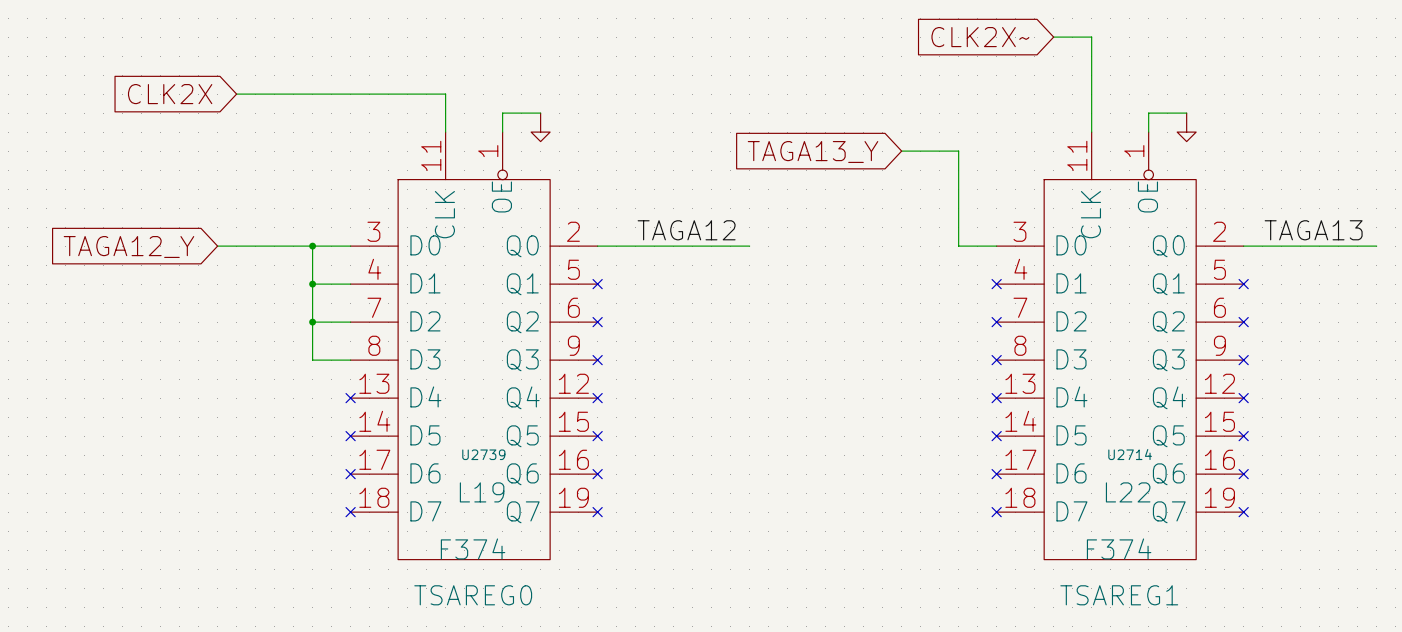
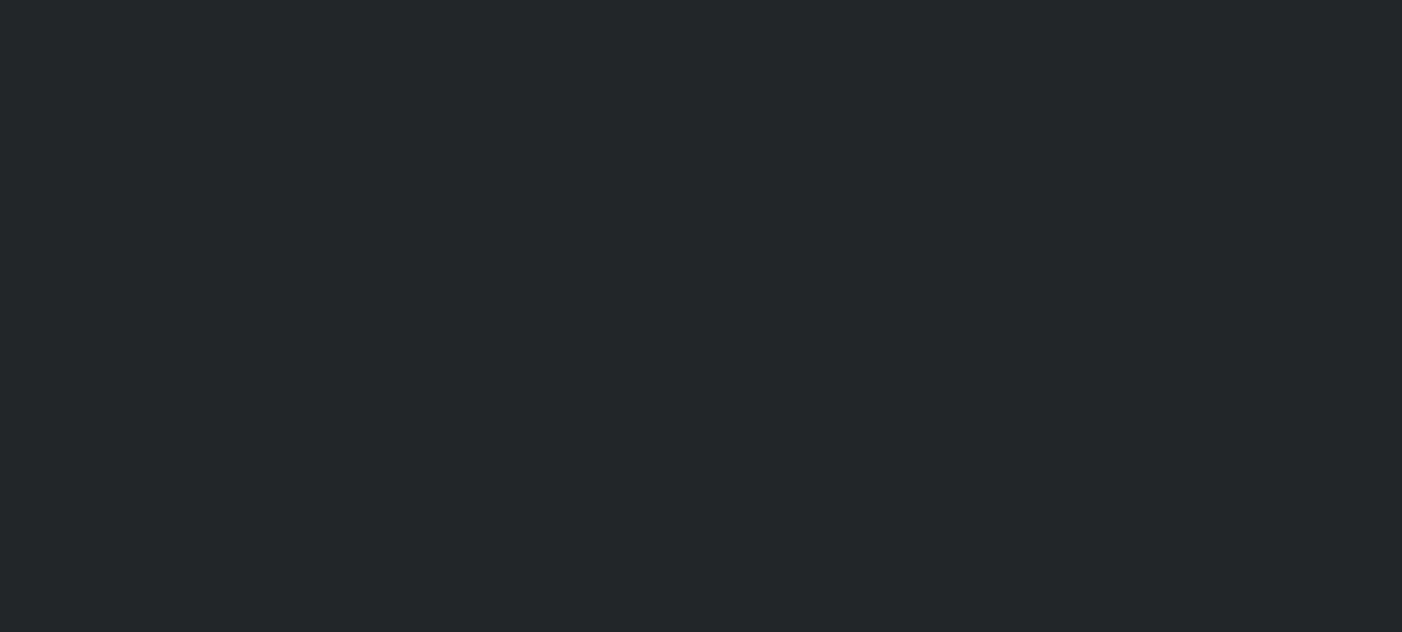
global label: CLK2X~ (980, 37) -> none
wire: (1053, 37) (1091, 37) (1091, 132) -> none
global label: CLK2X (170, 94) -> none
wire: (236, 94) (445, 94) (445, 132) -> none
wire: (540, 113) (502, 113) (502, 132) -> none
wire: (1186, 113) (1148, 113) (1148, 132) -> none
power symbol: (540, 127) -> none
power symbol: (1186, 127) -> none
wire: (901, 151) (958, 151) (958, 246) (996, 246) -> none
global label: TAGA13_Y (813, 152) -> none
label: TAGA12 (686, 230) -> none
label: TAGA13 (1313, 230) -> none
wire: (217, 246) (350, 246) -> none
wire: (312, 246) (312, 360) (350, 360) -> none
junction: (312, 246) -> none
wire: (597, 246) (749, 246) -> none
wire: (1243, 246) (1376, 246) -> none
global label: TAGA12_Y (128, 247) -> none
wire: (312, 284) (350, 284) -> none
junction: (312, 284) -> none
no-connect mark: (597, 284) -> none
no-connect mark: (996, 284) -> none
no-connect mark: (1243, 284) -> none
wire: (312, 322) (350, 322) -> none
junction: (312, 322) -> none
no-connect mark: (597, 322) -> none
no-connect mark: (996, 322) -> none
no-connect mark: (1243, 322) -> none
U2739: F374 (474, 345) -> none
U2714: F374 (1120, 345) -> none
no-connect mark: (597, 360) -> none
no-connect mark: (996, 360) -> none
no-connect mark: (1243, 360) -> none
no-connect mark: (350, 398) -> none
no-connect mark: (597, 398) -> none
no-connect mark: (996, 398) -> none
no-connect mark: (1243, 398) -> none
no-connect mark: (350, 436) -> none
no-connect mark: (597, 436) -> none
no-connect mark: (996, 436) -> none
no-connect mark: (1243, 436) -> none
no-connect mark: (350, 474) -> none
no-connect mark: (597, 474) -> none
no-connect mark: (996, 474) -> none
no-connect mark: (1243, 474) -> none
no-connect mark: (350, 512) -> none
no-connect mark: (597, 512) -> none
no-connect mark: (996, 512) -> none
no-connect mark: (1243, 512) -> none

